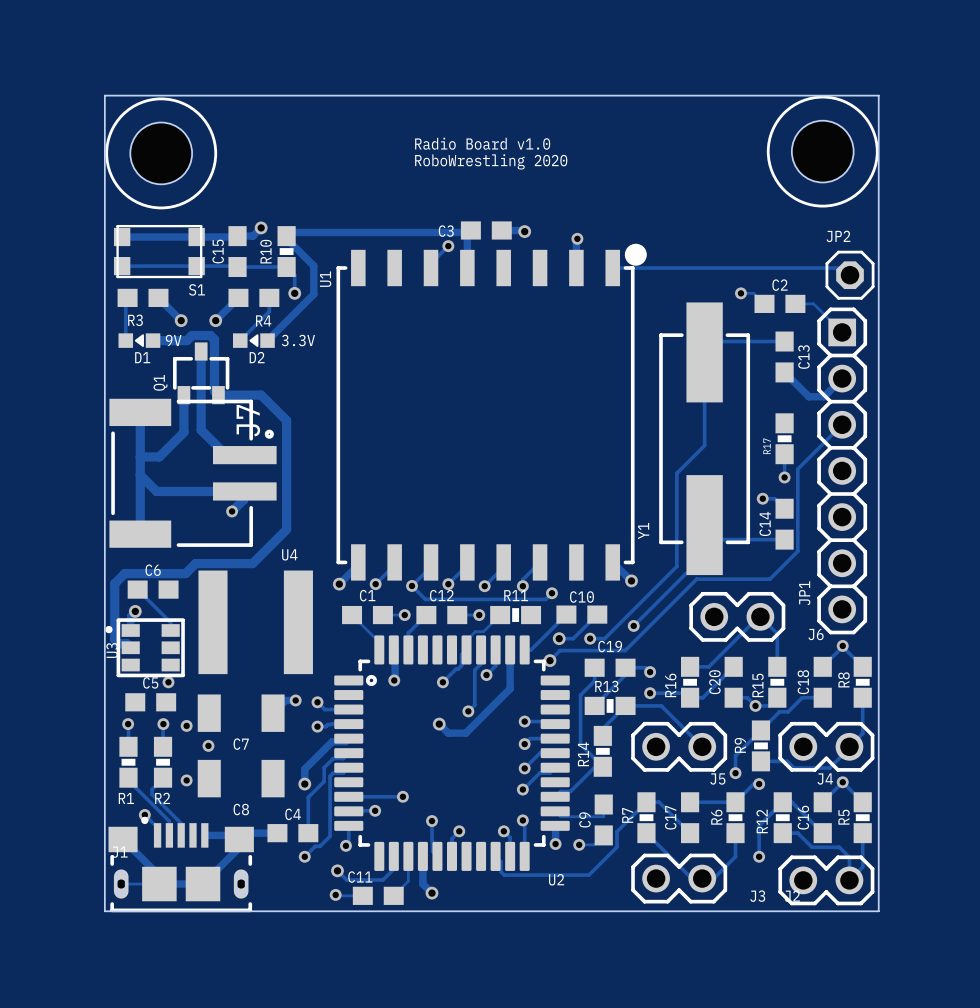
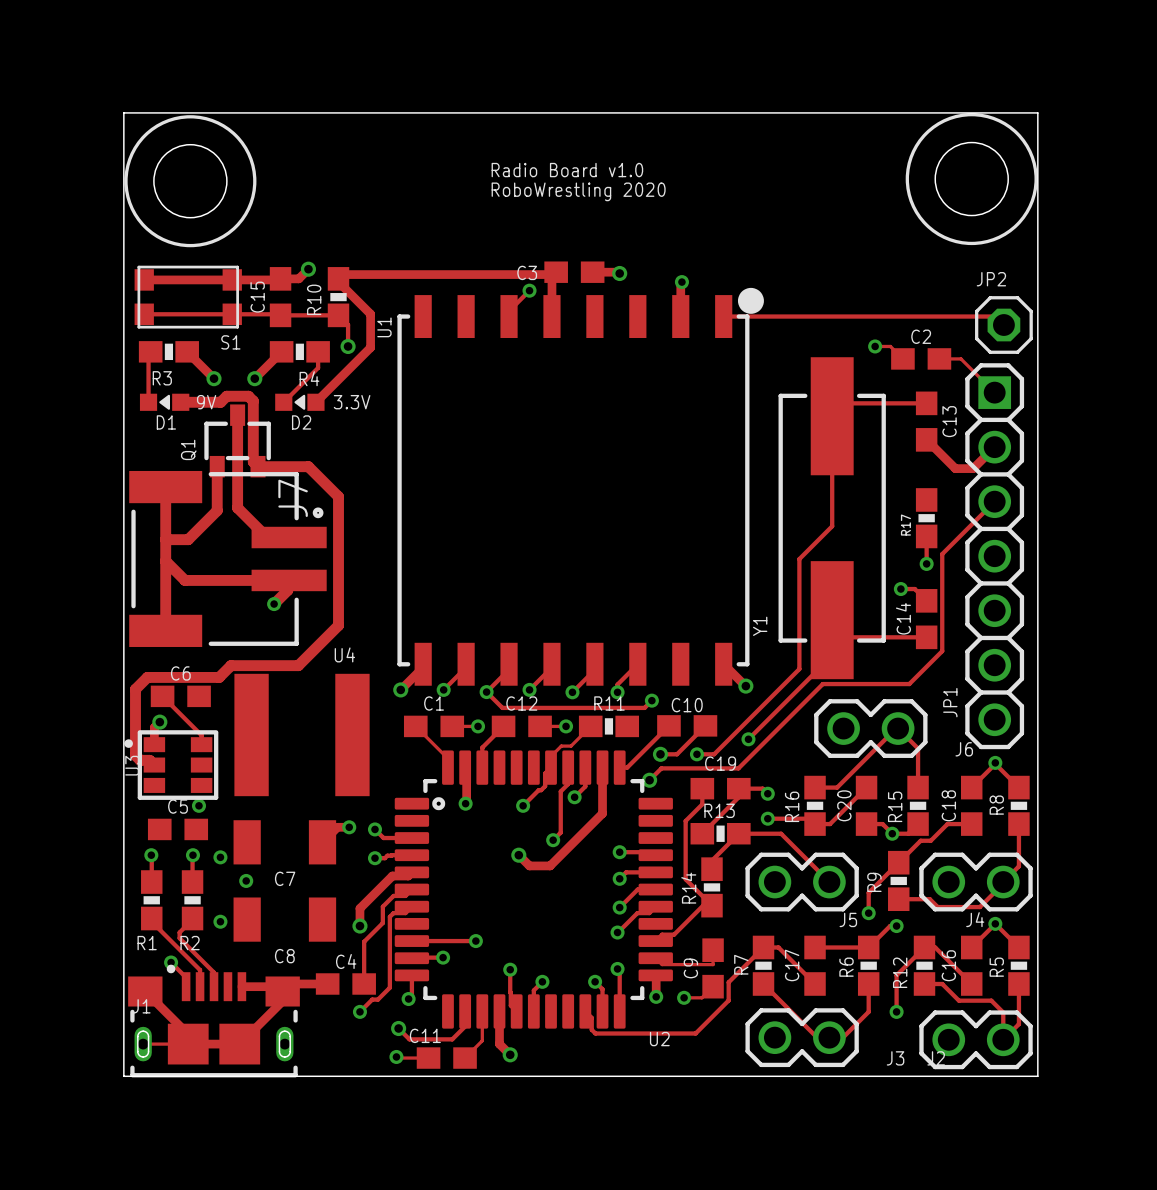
R3 footprint: [117, 288, 169, 307] -> [138, 341, 199, 363]
R4 footprint: [228, 288, 280, 307] -> [269, 341, 330, 363]

